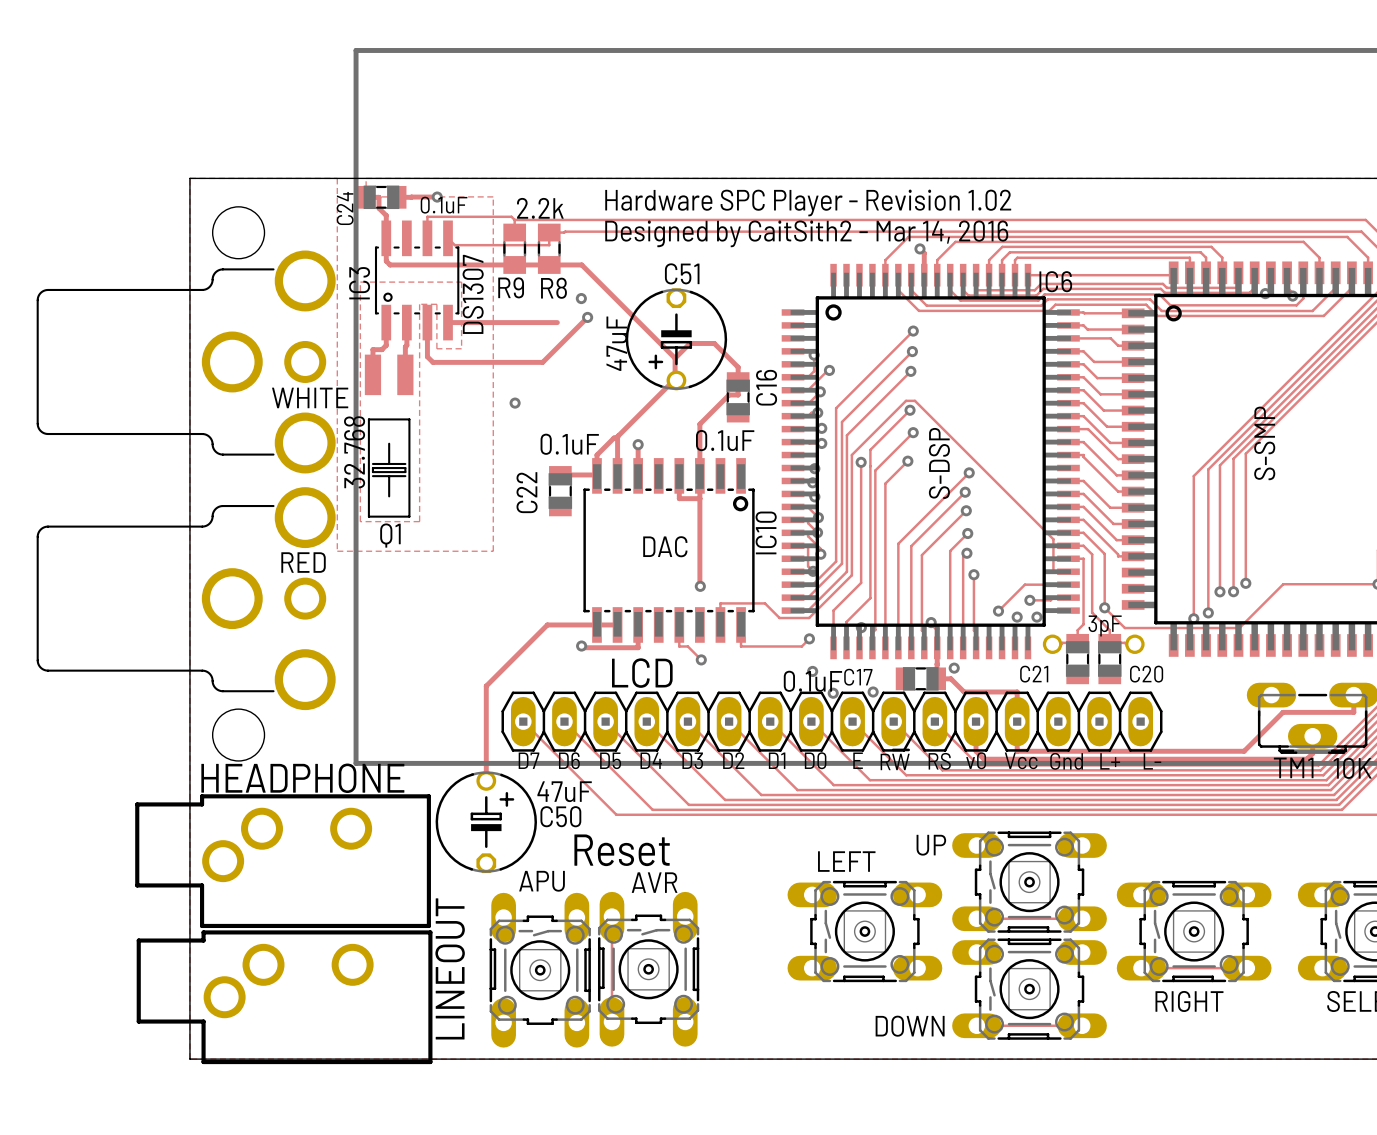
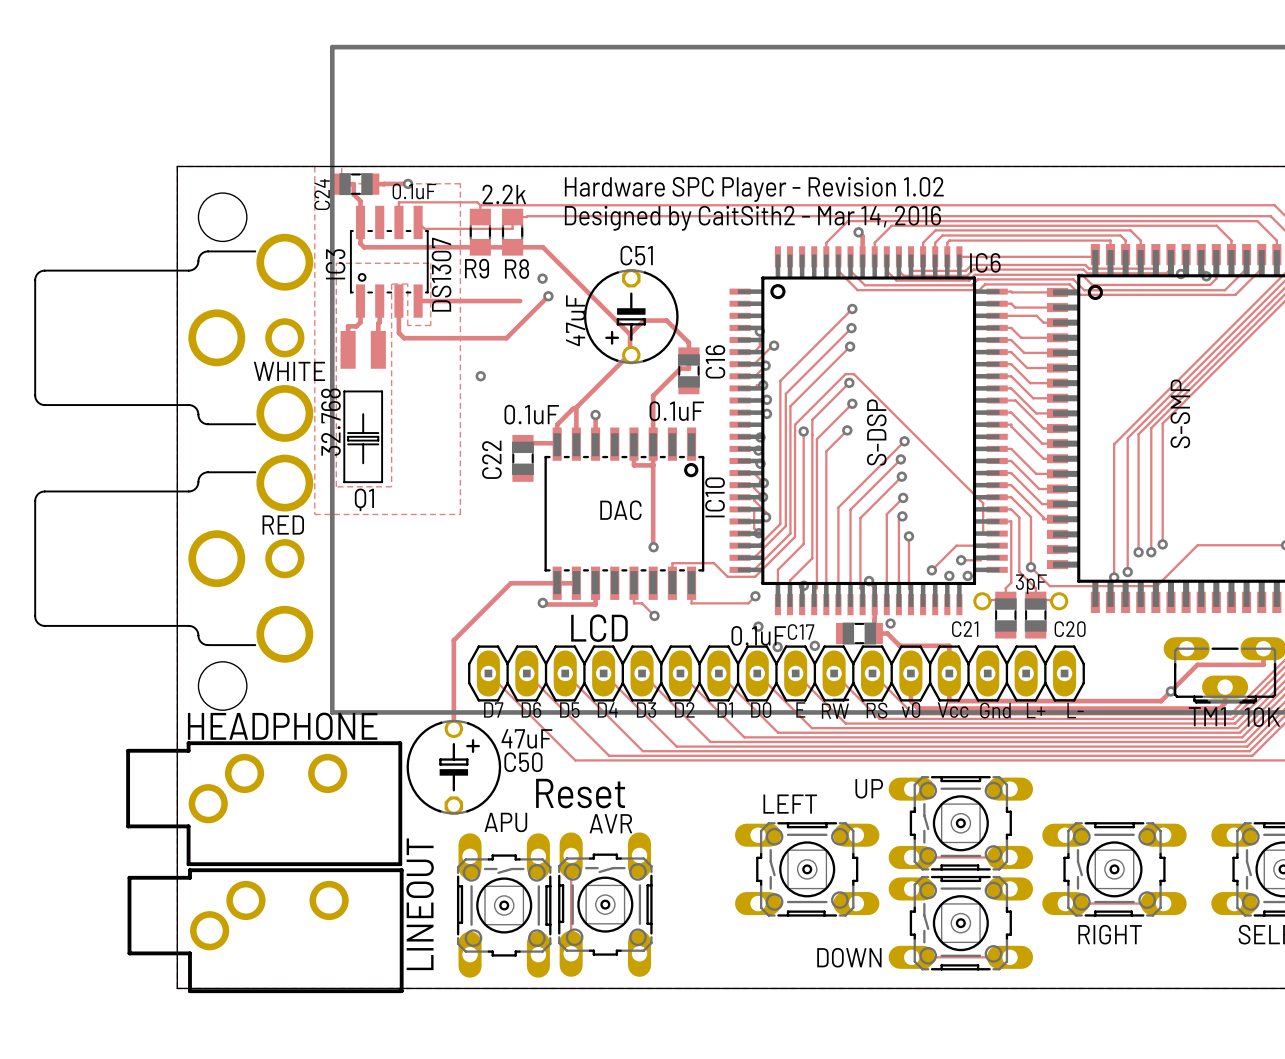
via: none -> (1170, 691)

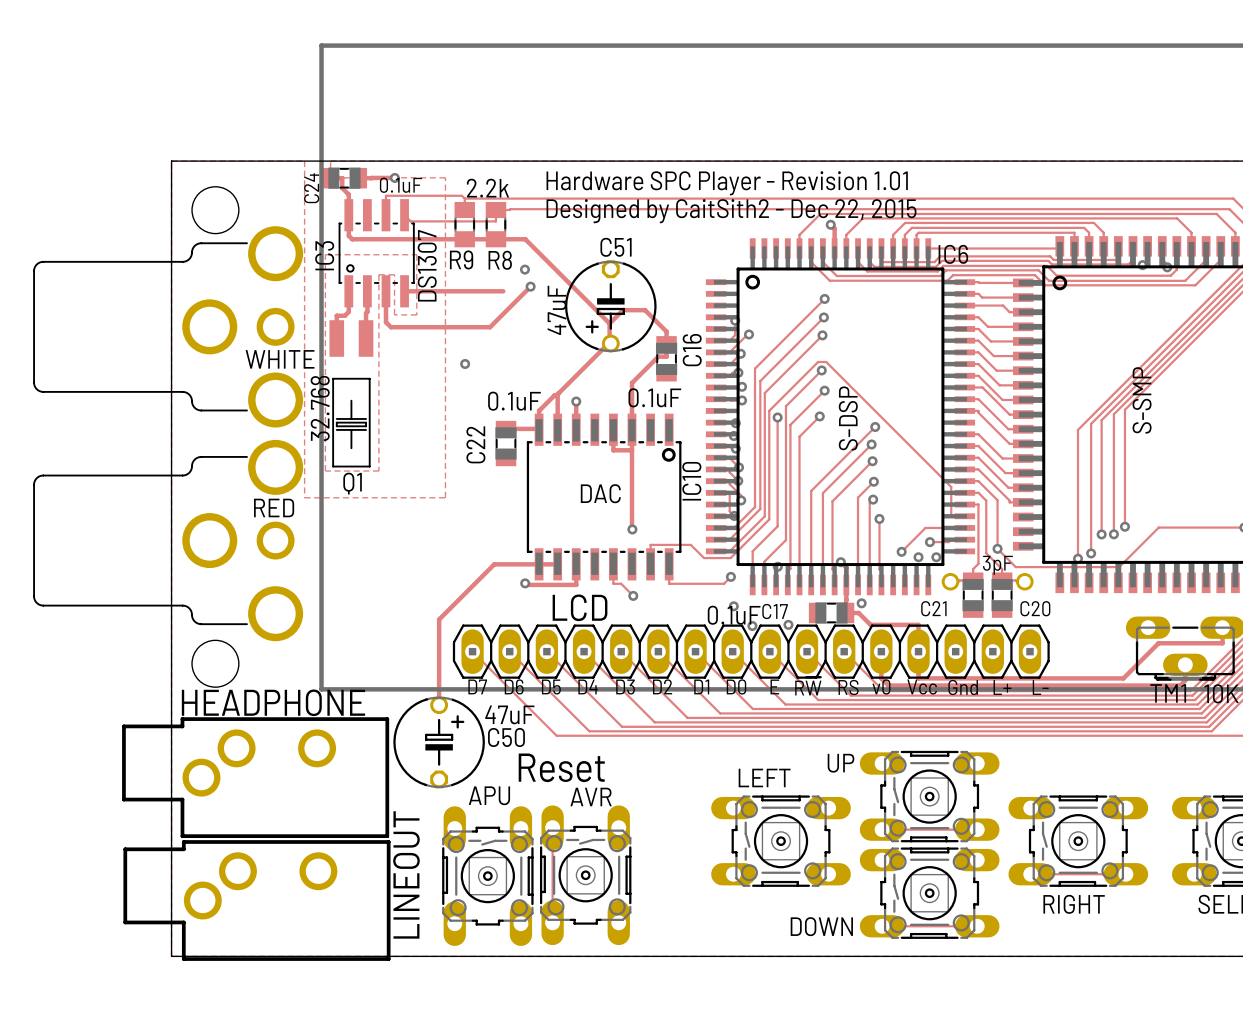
text: Hardware SPC Player - Revision 1.02 (754, 189) -> Hardware SPC Player - Revision 1.01 (727, 183)
text: Designed by CaitSith2 - Mar 14, 2016 (752, 218) -> Designed by CaitSith2 - Dec 22, 2015 (731, 211)
via: (1170, 691) -> none

